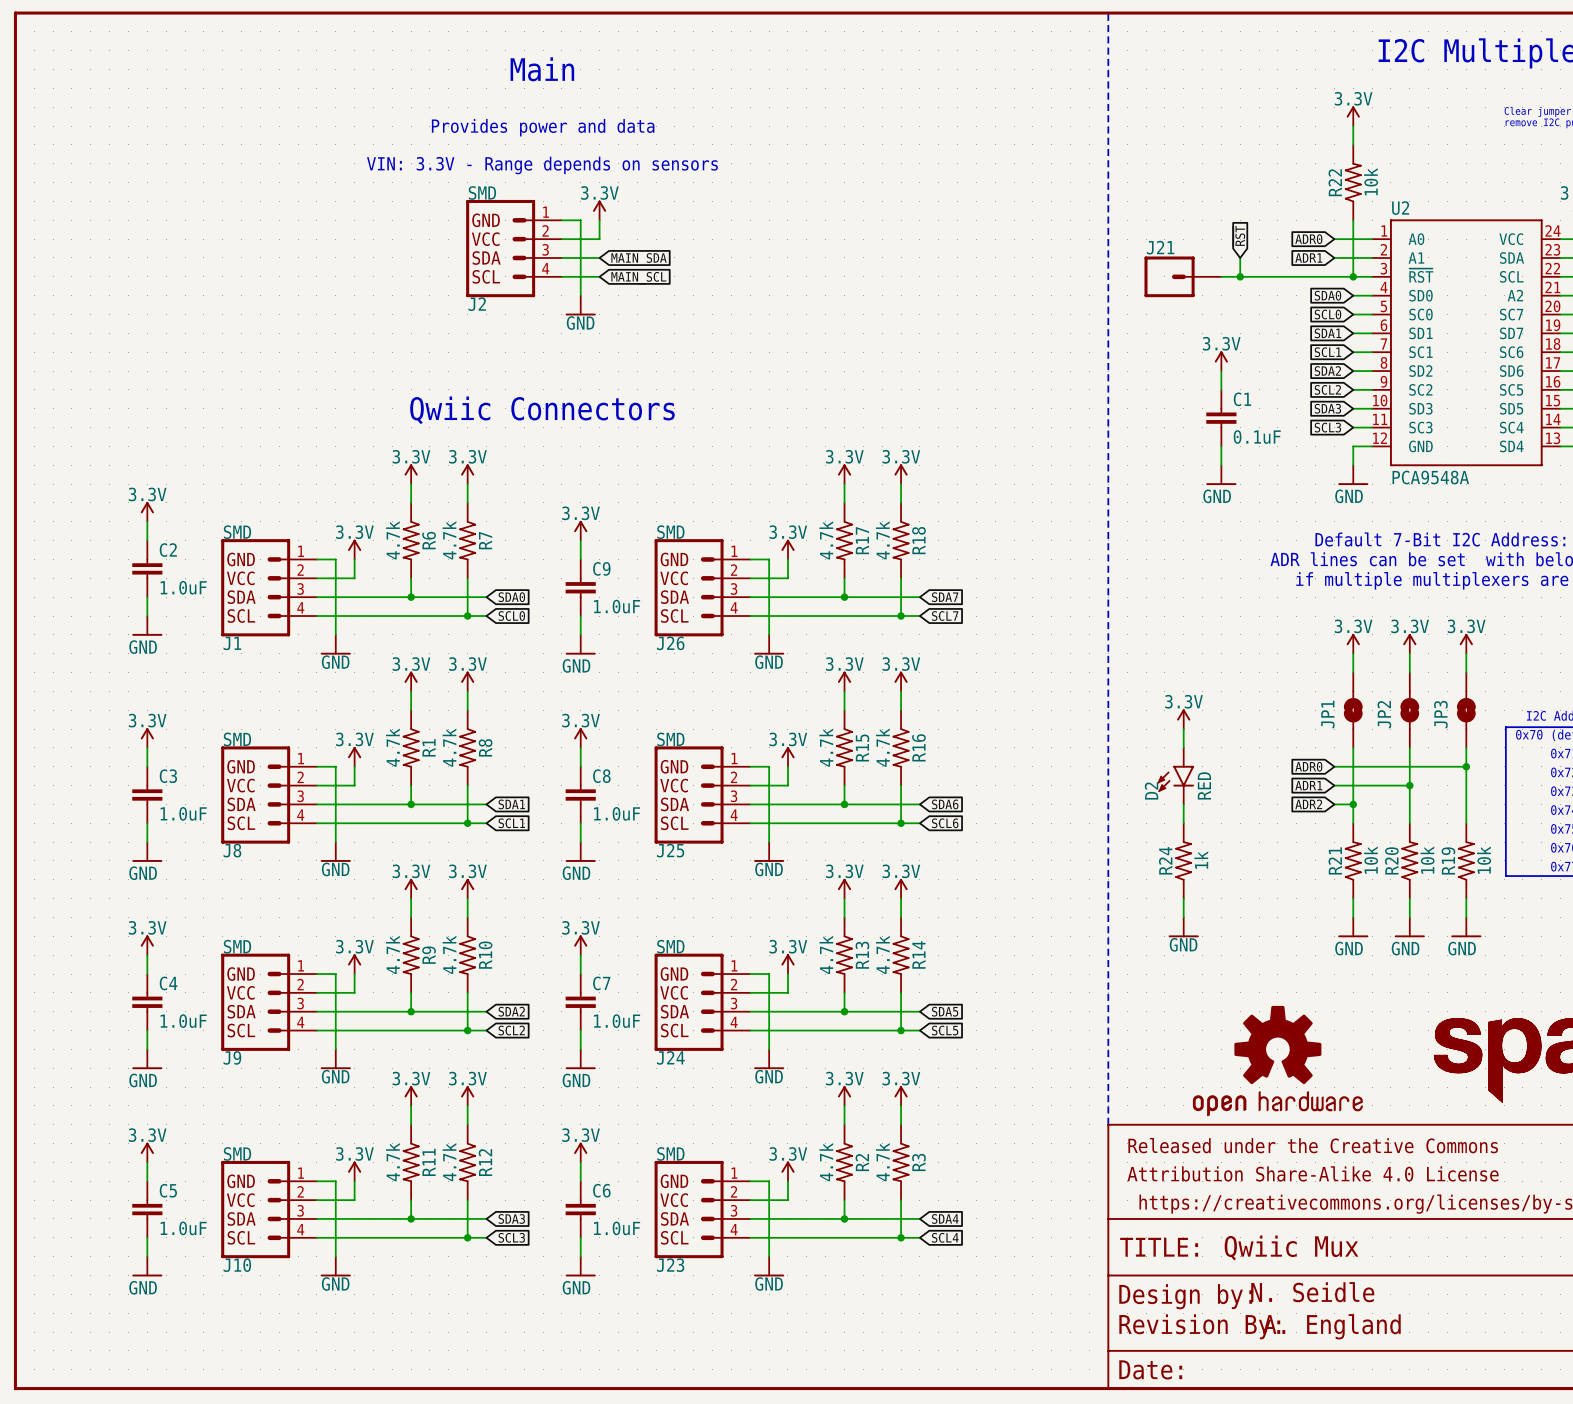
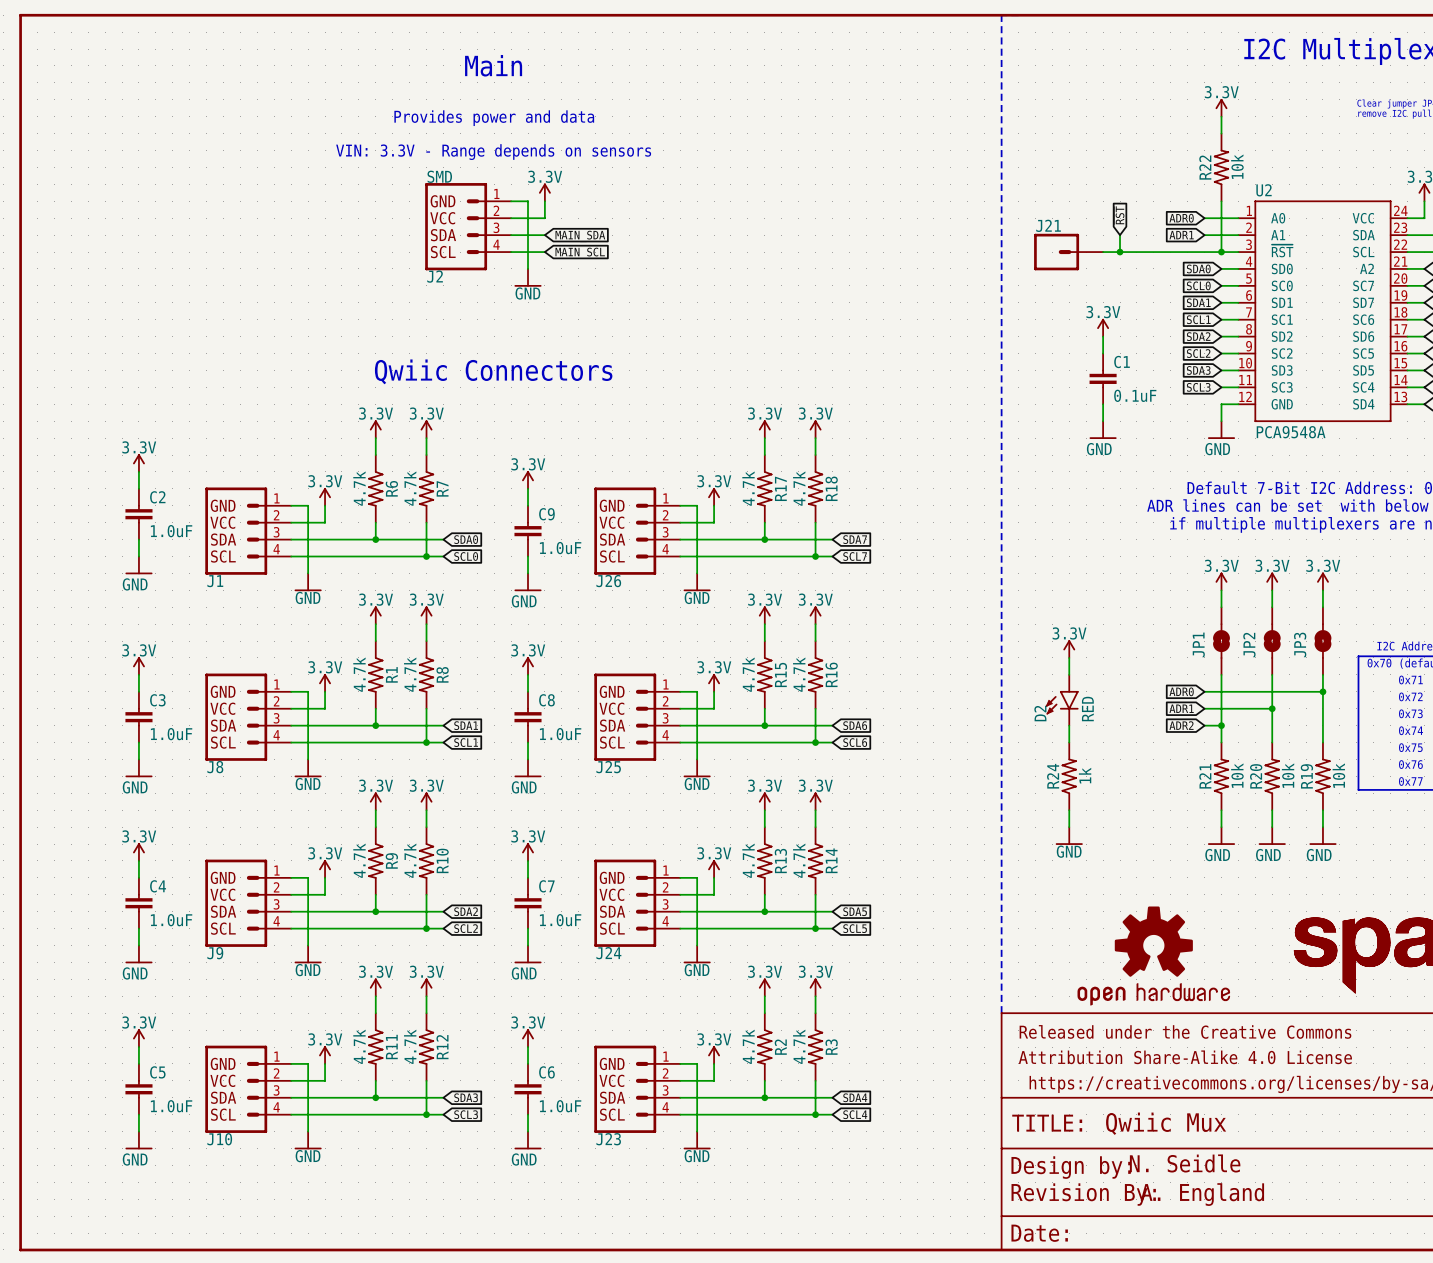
J1 value: SMD (237, 532) -> none
J26 value: SMD (670, 532) -> none
J8 value: SMD (237, 739) -> none
J25 value: SMD (670, 739) -> none
J9 value: SMD (237, 946) -> none
J24 value: SMD (670, 946) -> none
J10 value: SMD (237, 1153) -> none
J23 value: SMD (670, 1153) -> none

